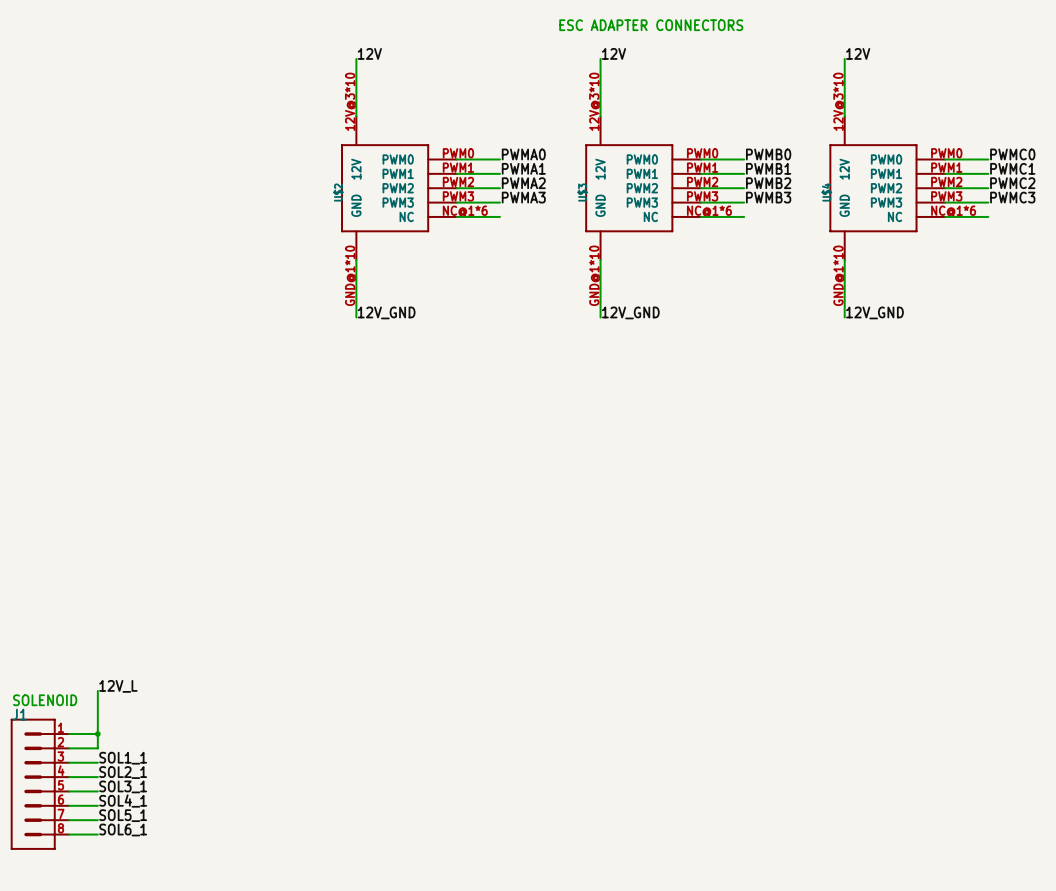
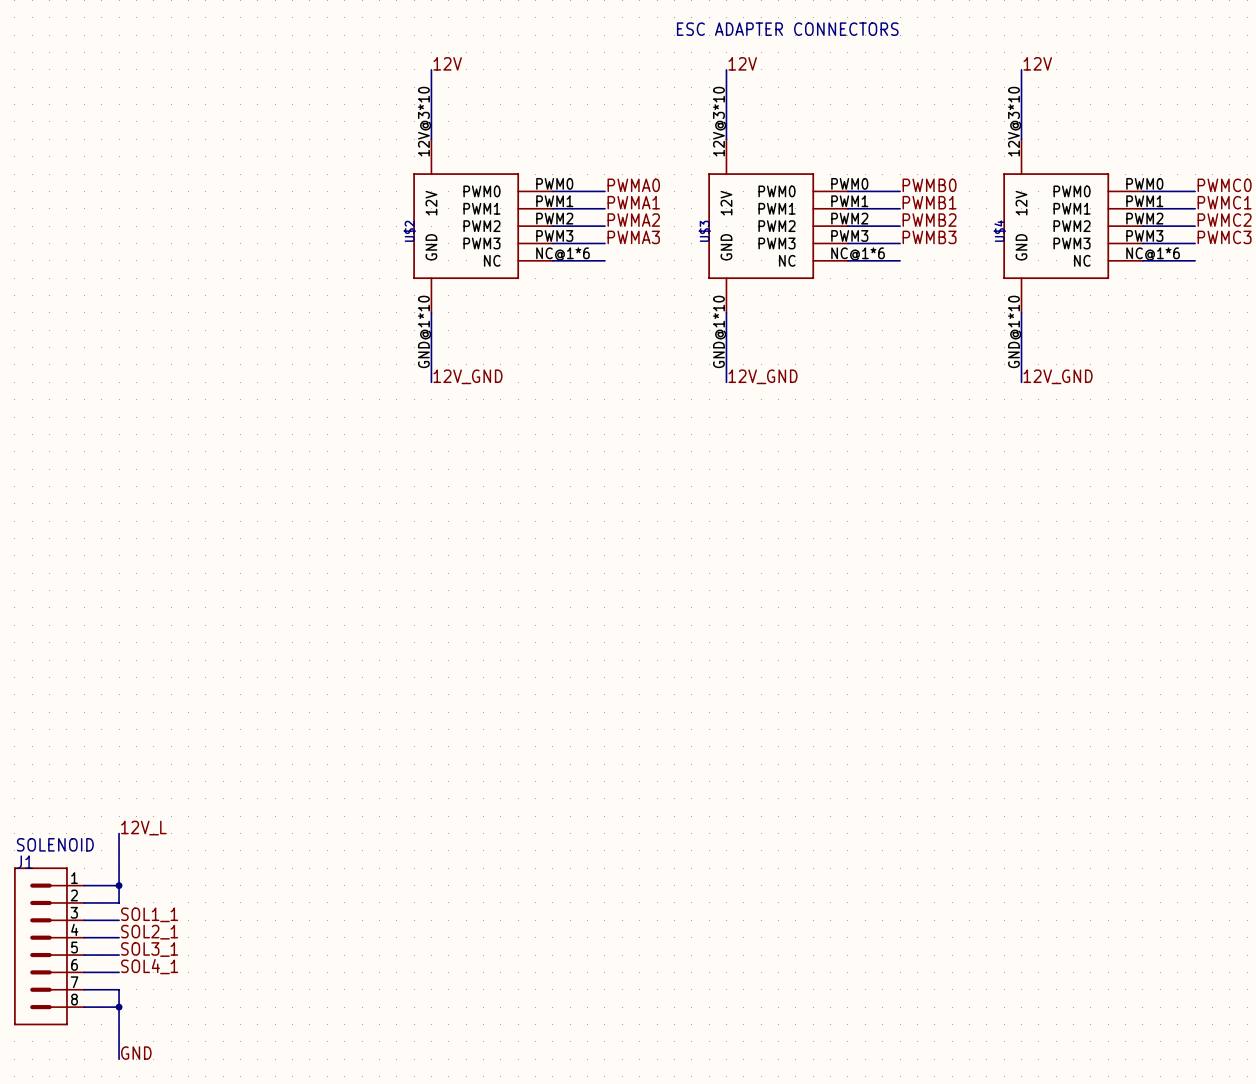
label: SOL5_1 (123, 815) -> none
wire: none -> (119, 989) (119, 1059)
label: SOL6_1 (123, 830) -> none
junction: none -> (119, 1007)
label: none -> GND (136, 1053)

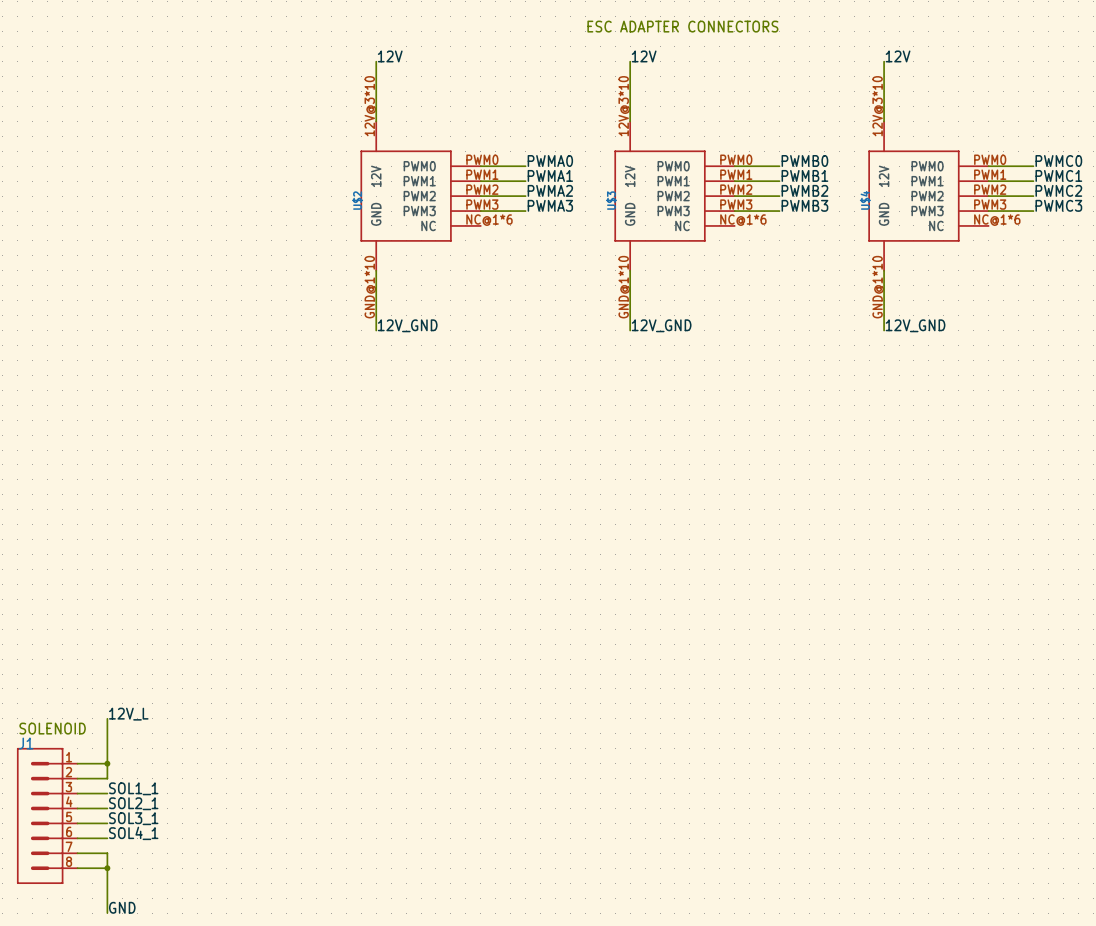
wire: (552, 260) (604, 260) -> none
wire: (847, 260) (900, 260) -> none
wire: (1142, 260) (1195, 260) -> none

